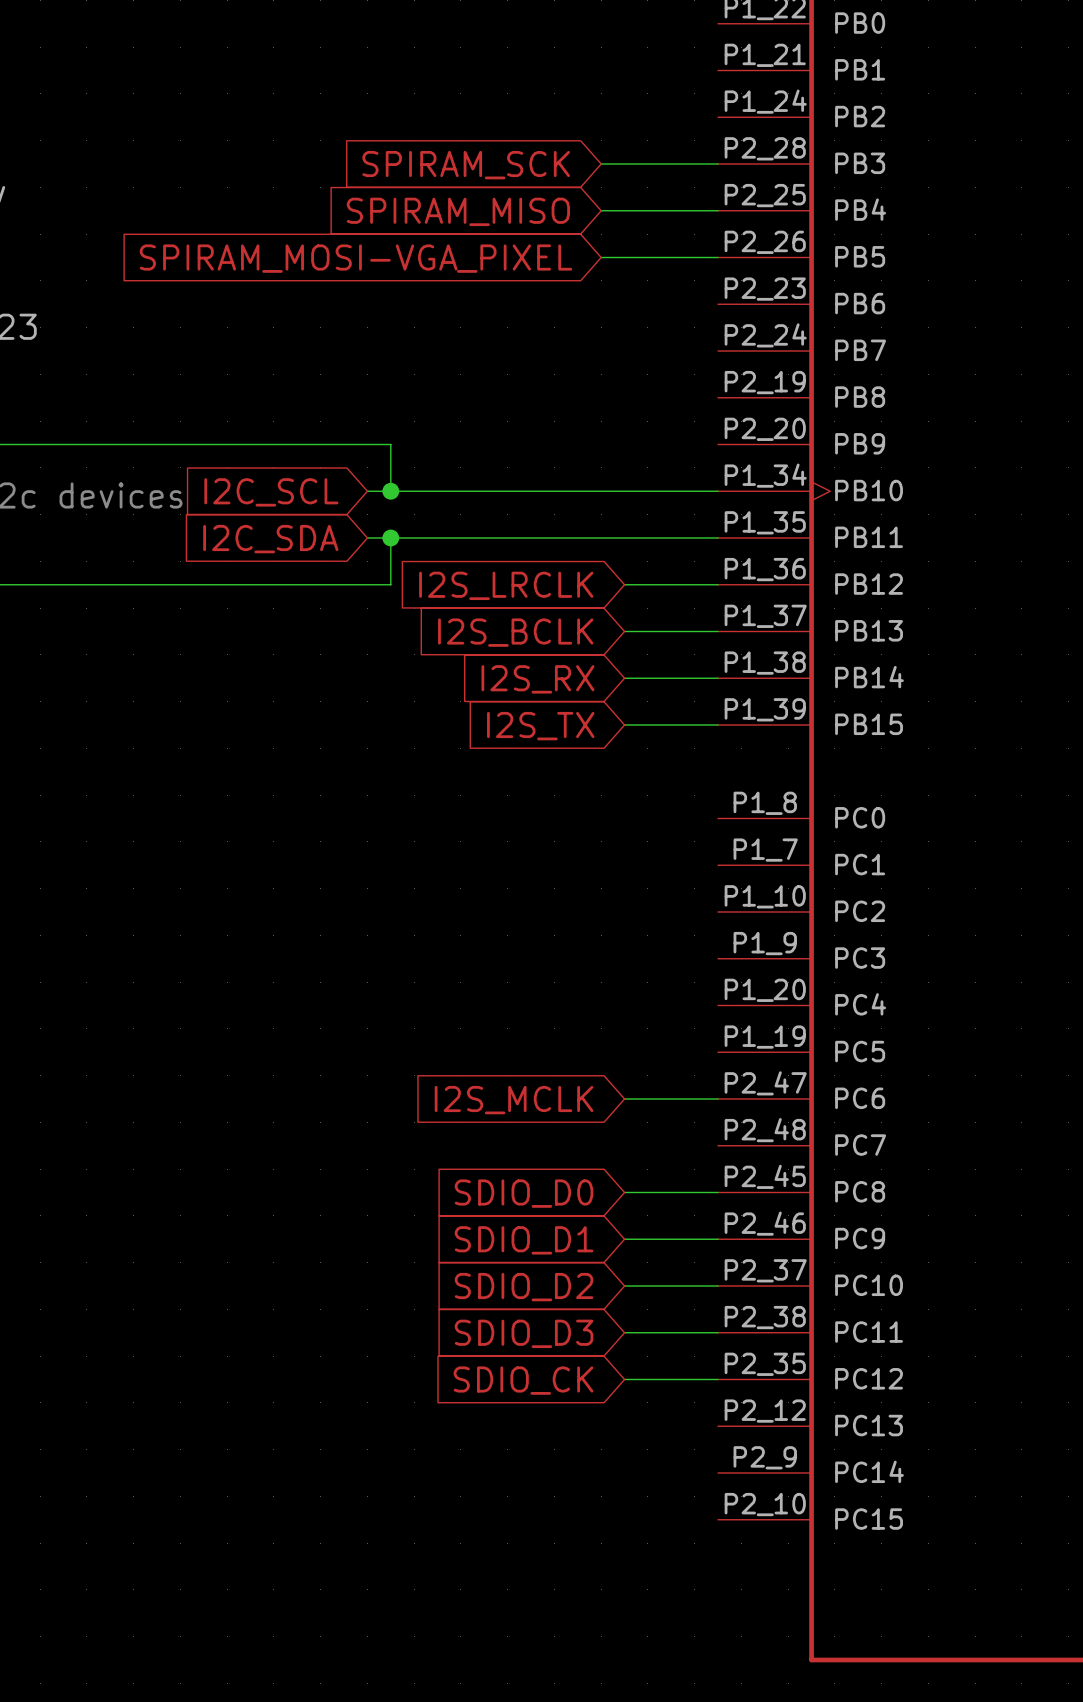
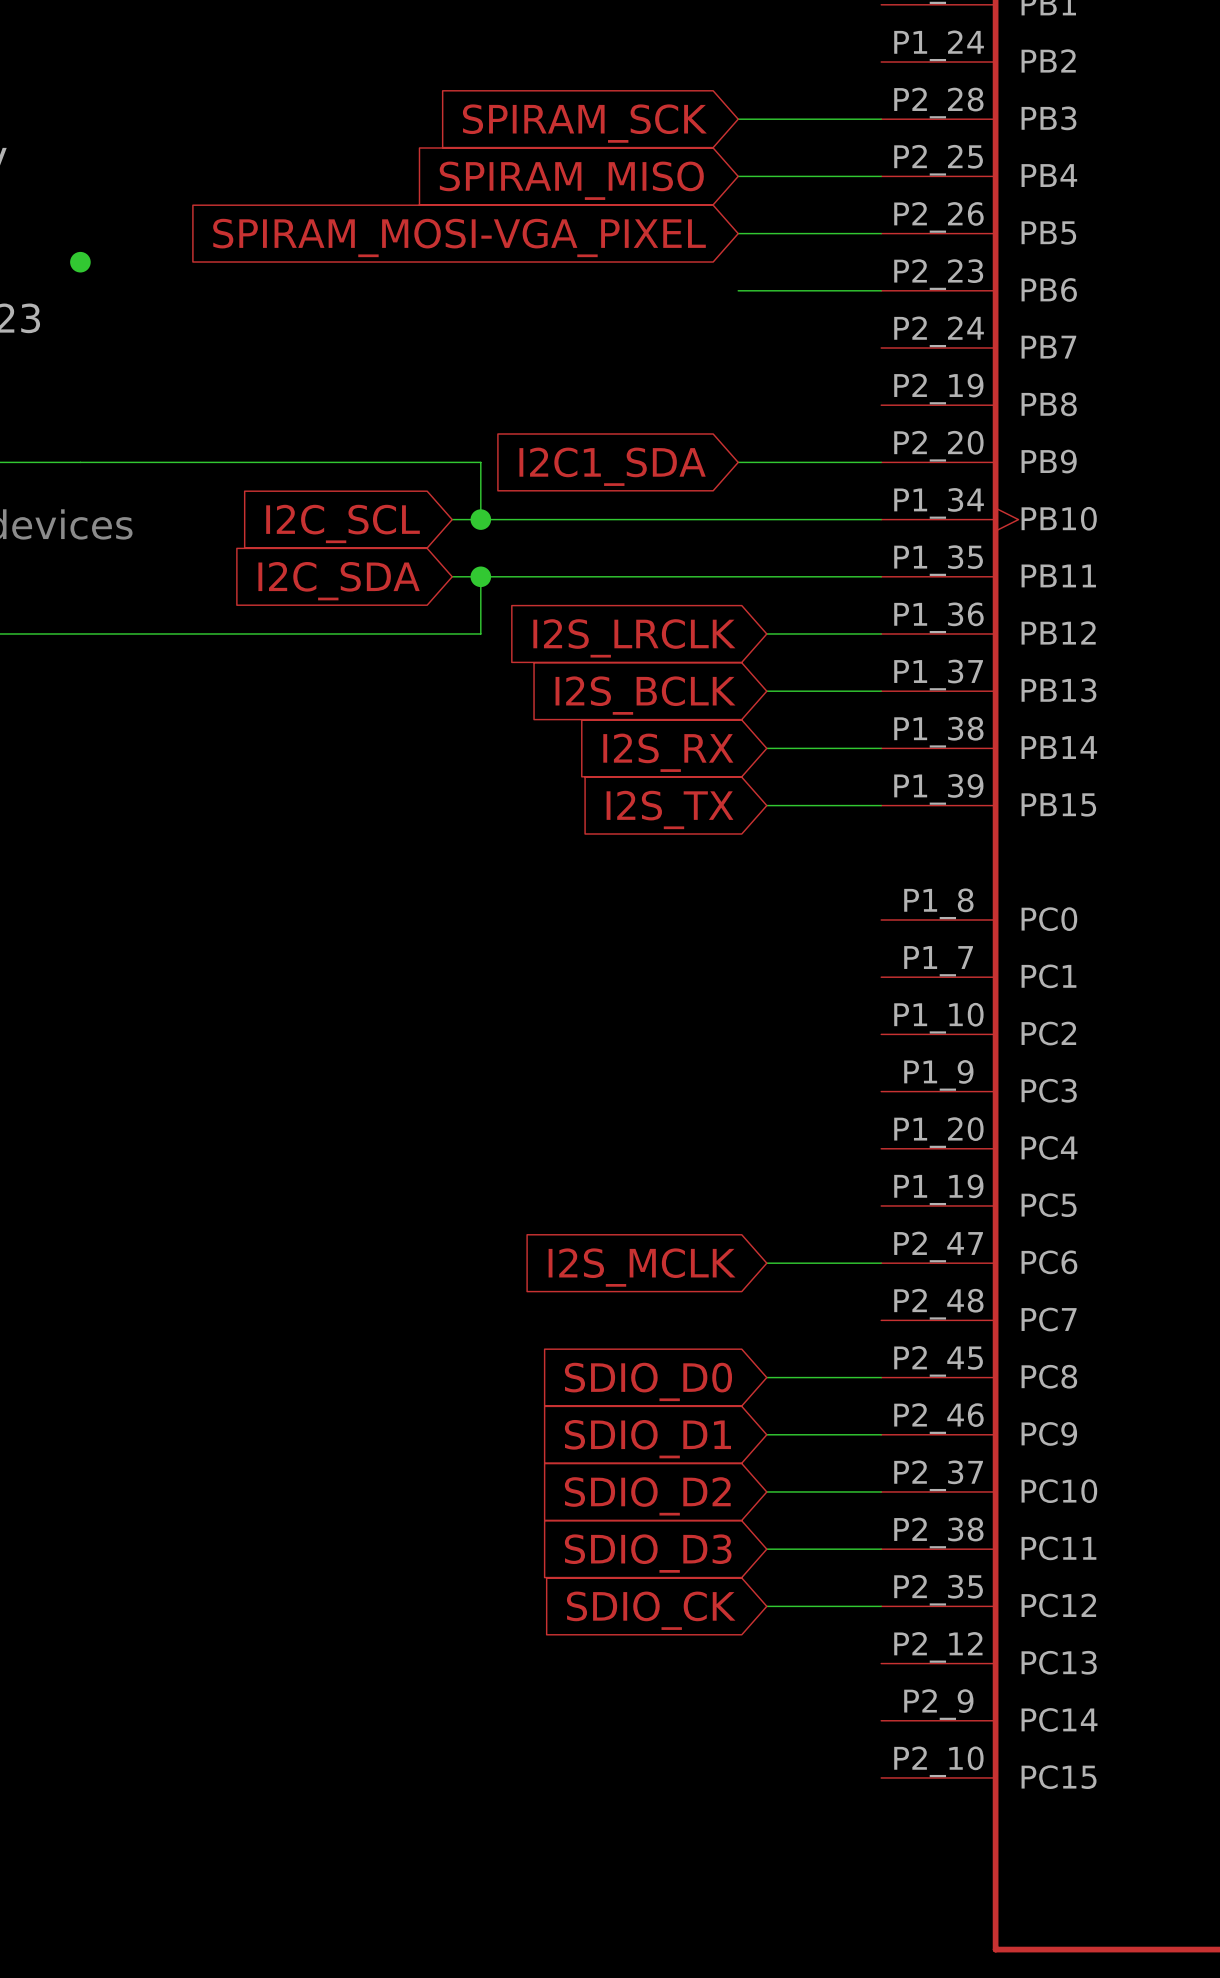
junction: none -> (80, 262)
wire: none -> (738, 290) (881, 290)
wire: none -> (738, 462) (881, 462)
global label: none -> I2C1_SDA (612, 466)

